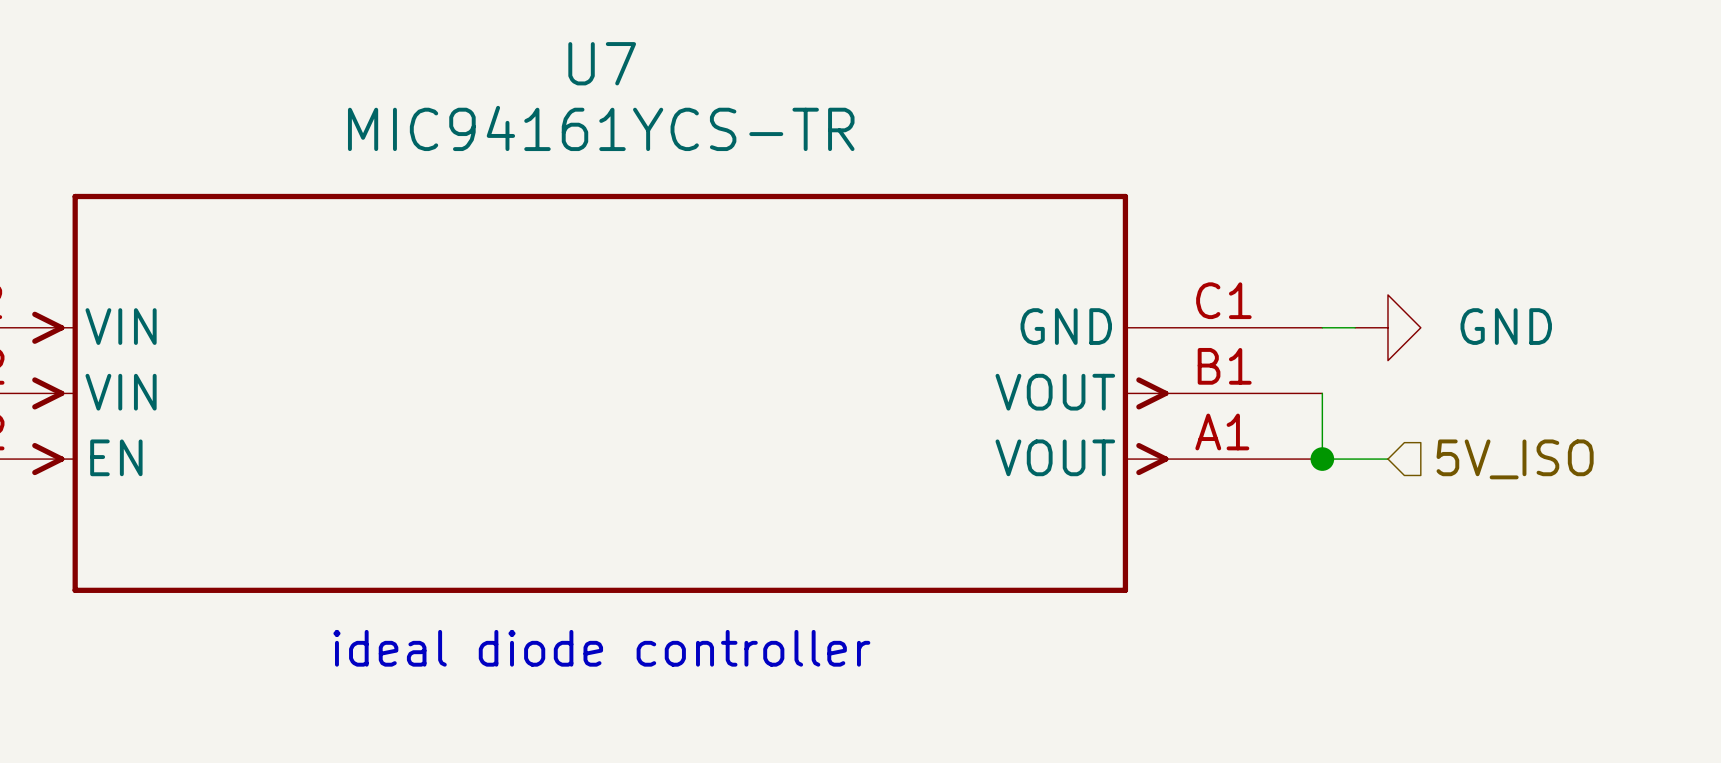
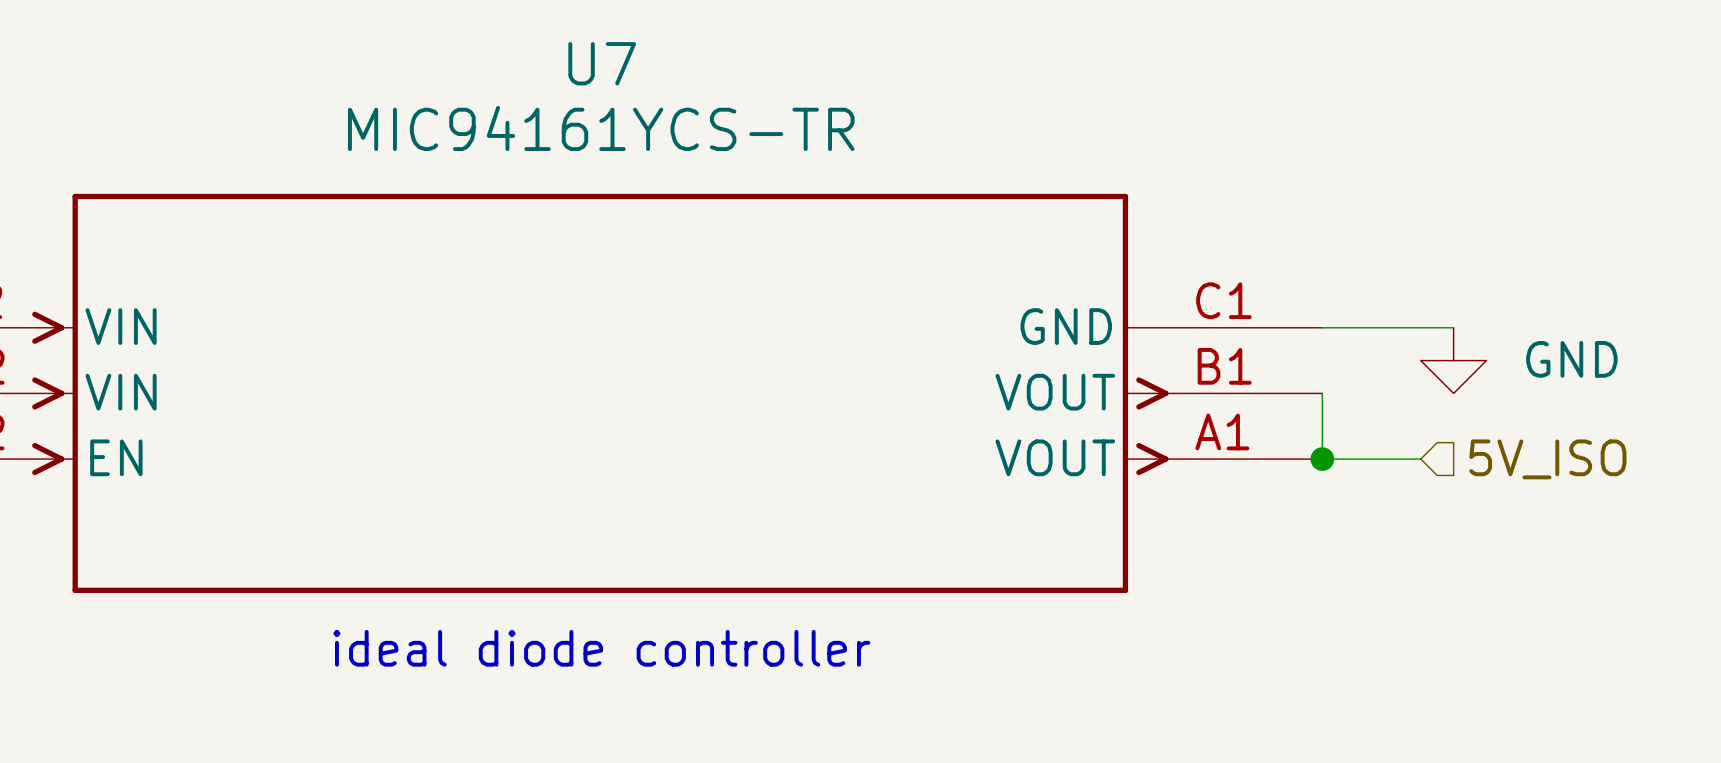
wire: none -> (1355, 327) (1453, 327)
power symbol rotation: 0° (1387, 327) -> 90° clockwise (1453, 360)
power symbol position: GND (1387, 327) -> GND (1453, 360)
wire: none -> (1387, 459) (1420, 459)
hierarchical label position: 5V_ISO (1515, 459) -> 5V_ISO (1547, 459)

